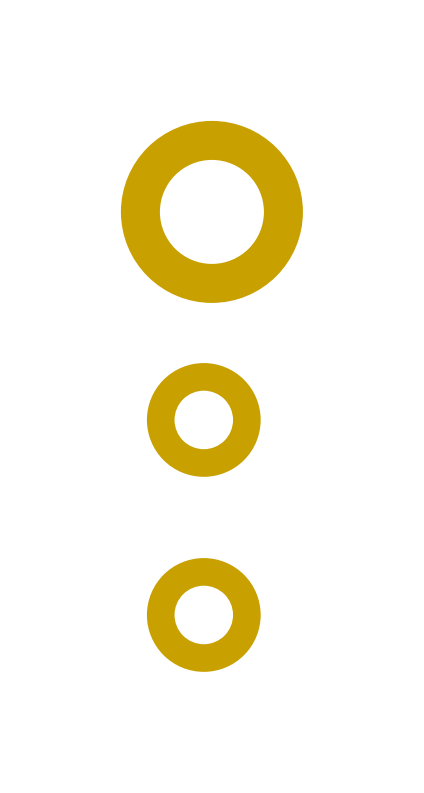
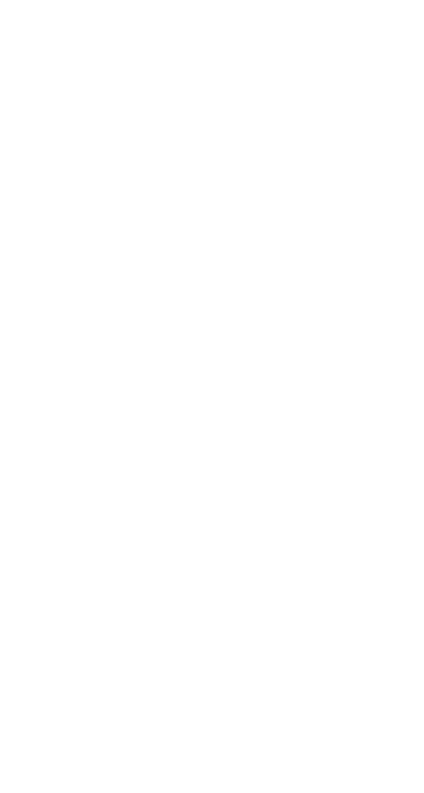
part: (211, 211) -> none
part: (203, 419) -> none
part: (203, 614) -> none

